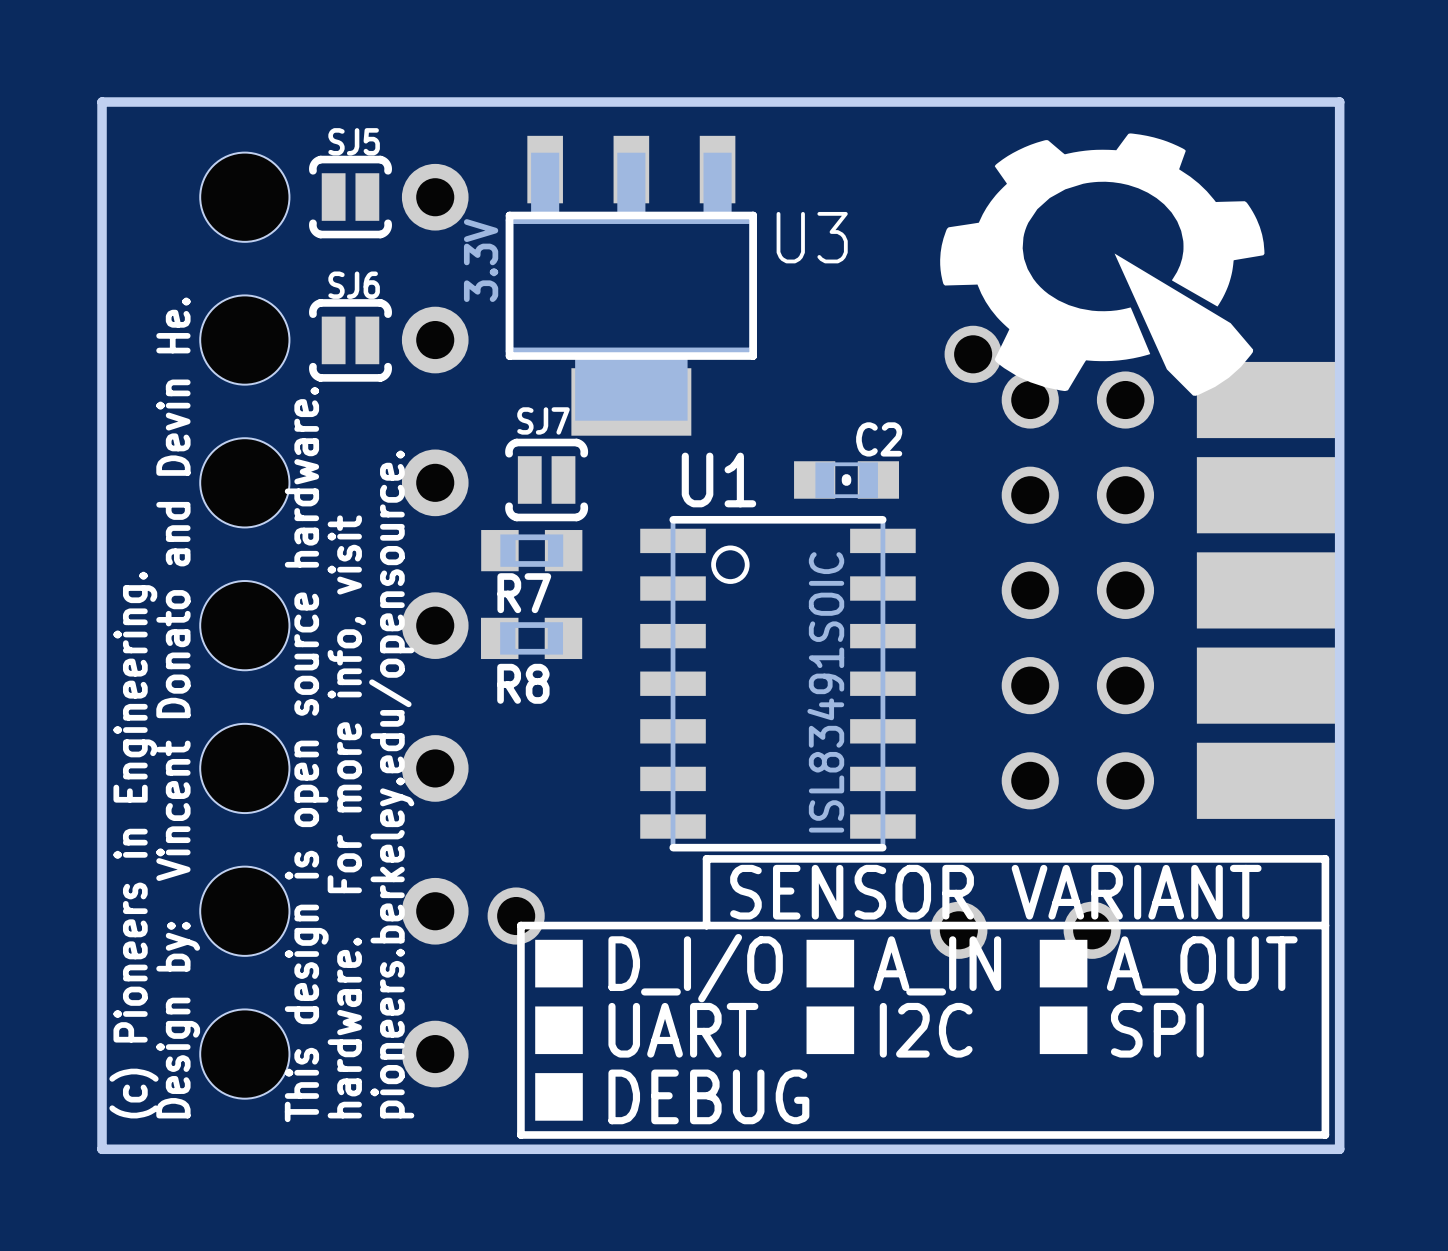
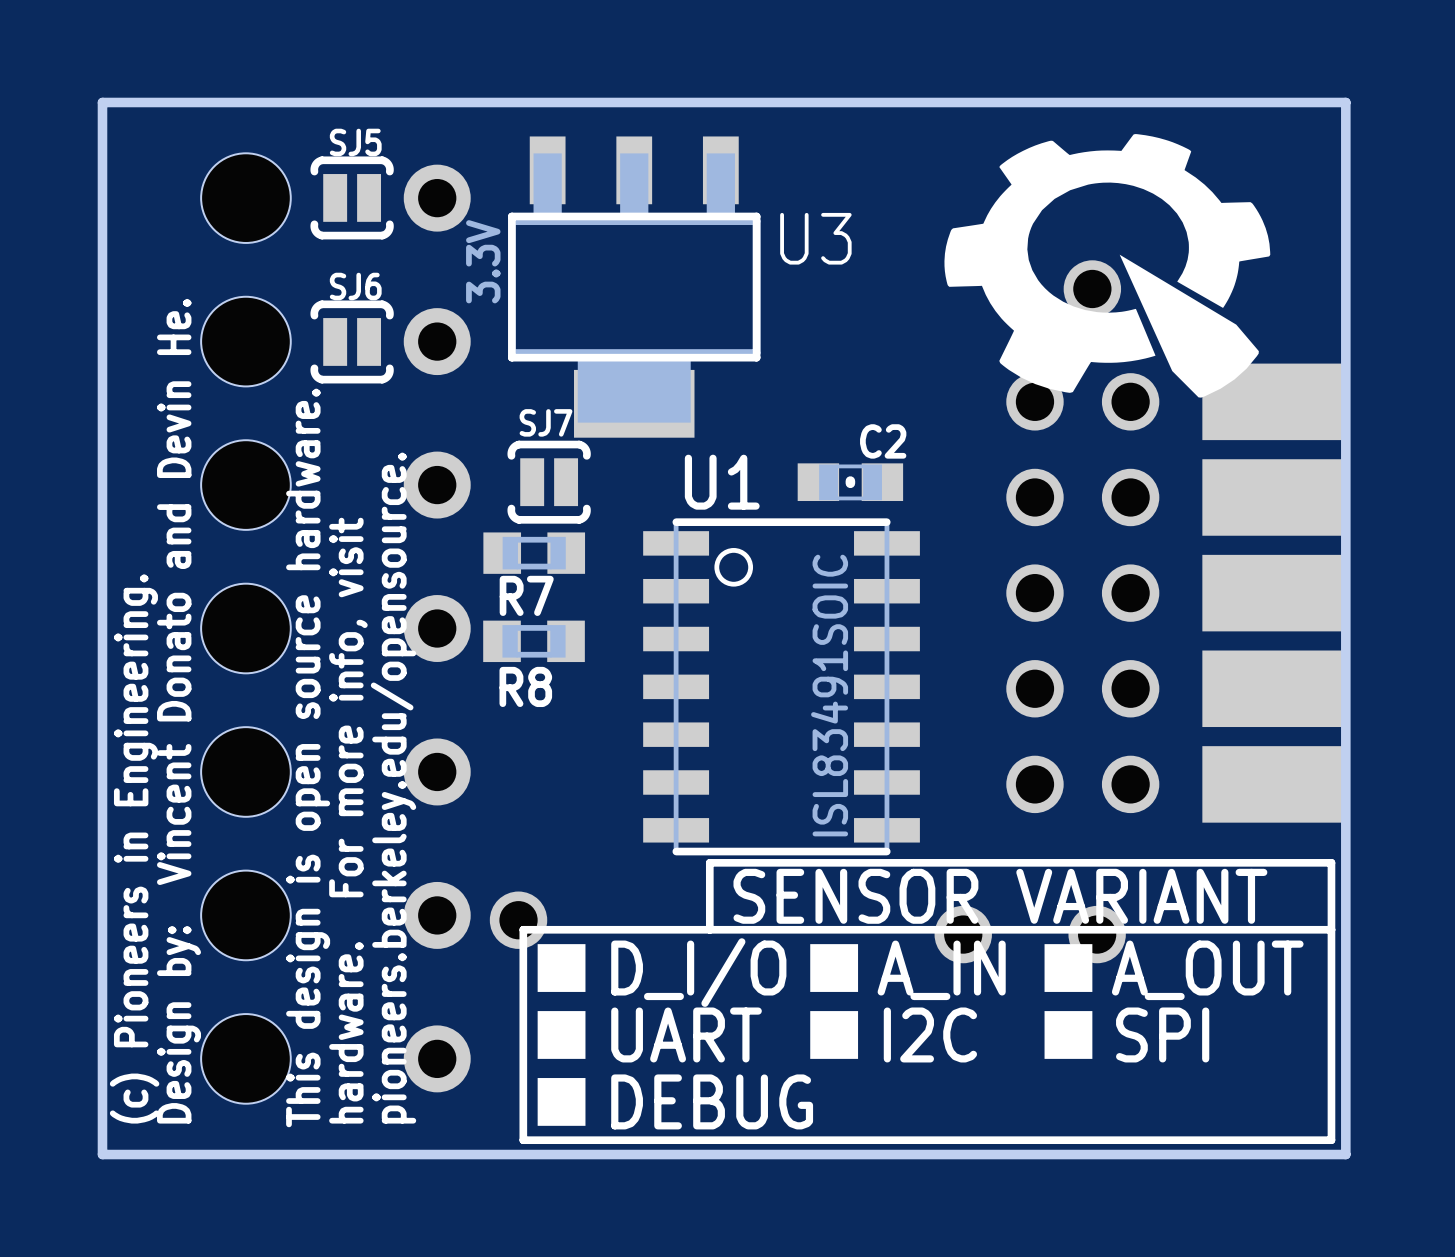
part position: (973, 354) -> (1092, 288)

